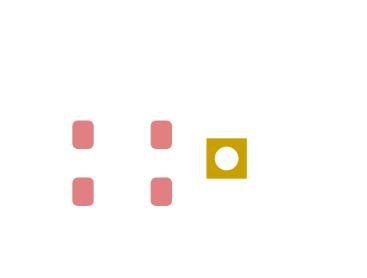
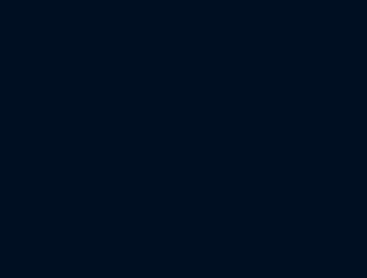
part: (122, 134) -> none
part: (226, 158) -> none
part: (122, 191) -> none

